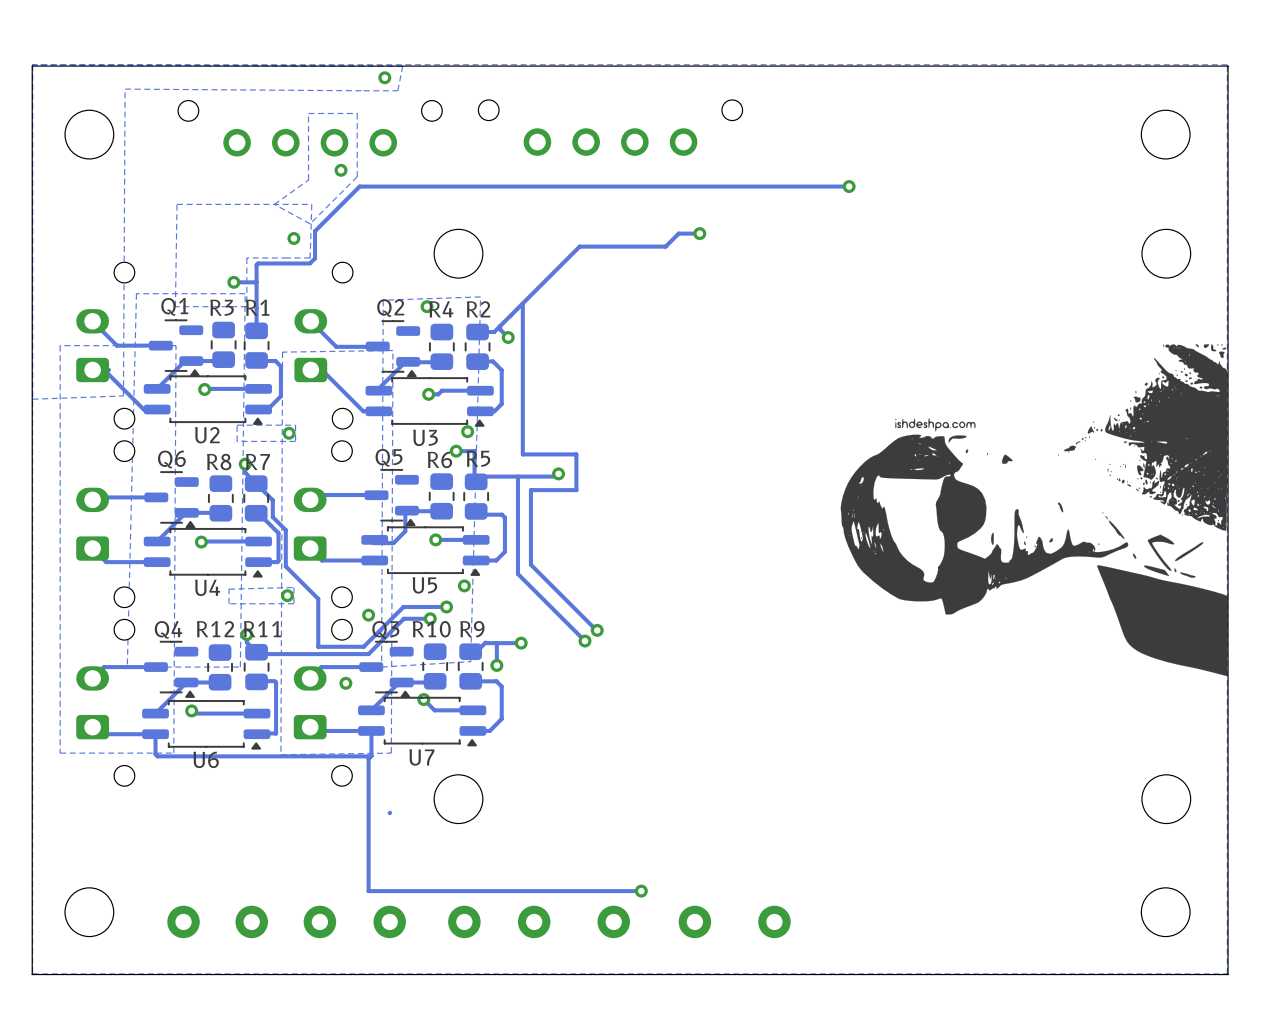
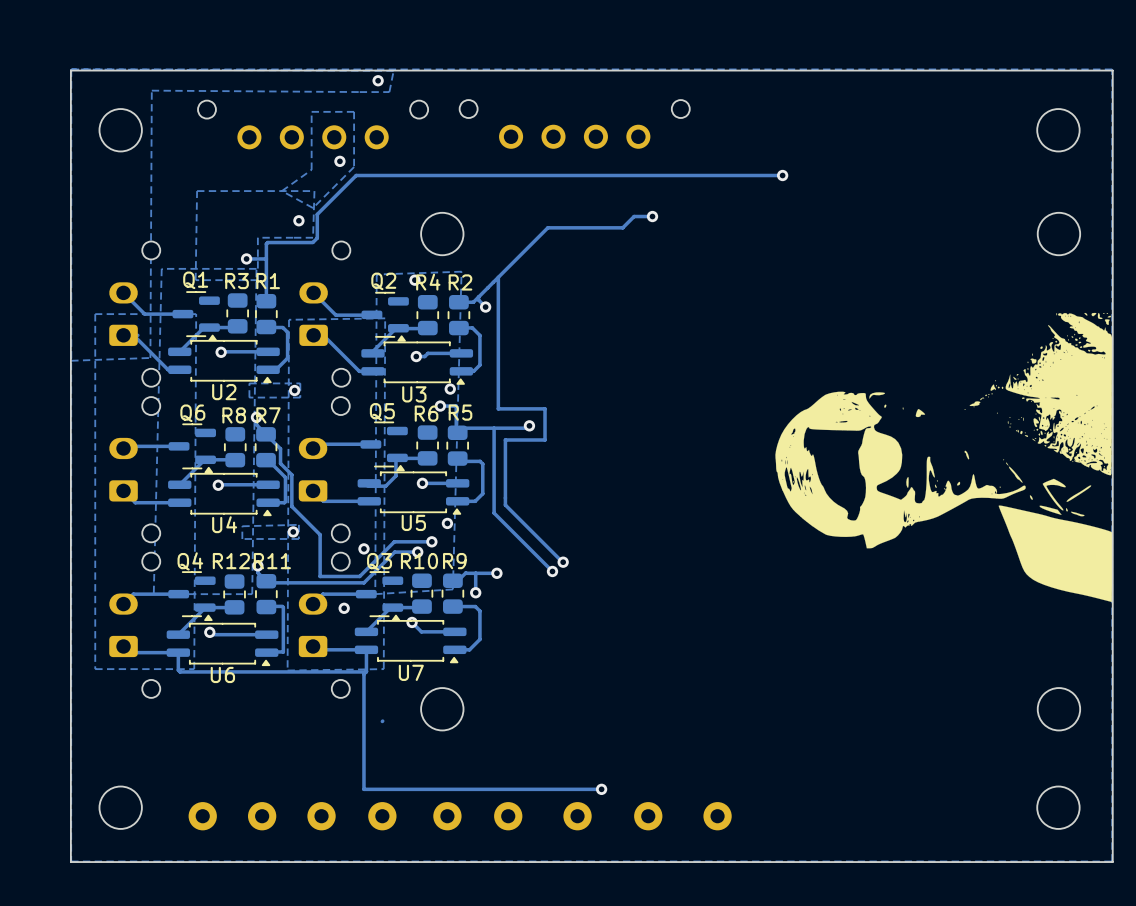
drawing: [895, 418, 976, 432] -> none

